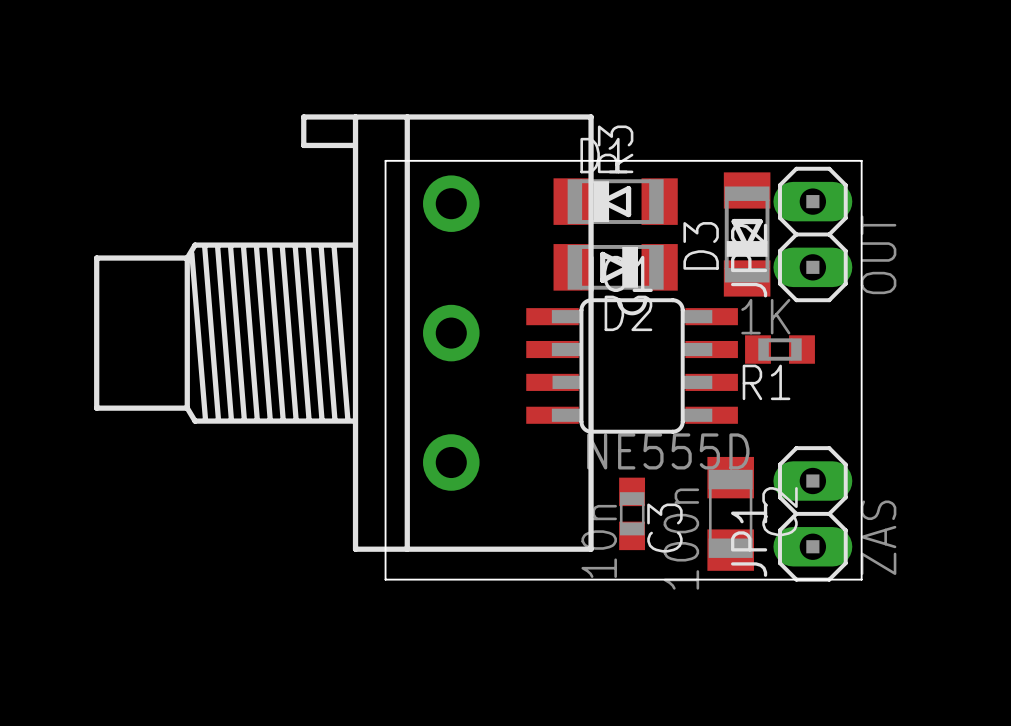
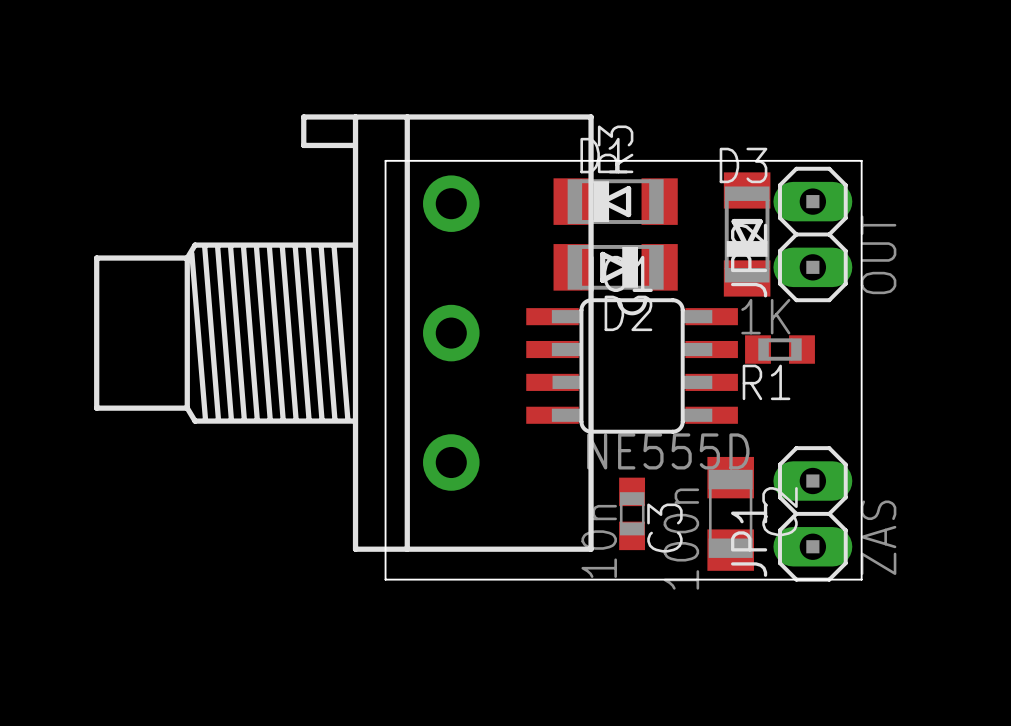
D3 name rotation: 0° (701, 245) -> 90° clockwise (743, 165)
D3 name position: D3 (701, 245) -> D3 (743, 165)

